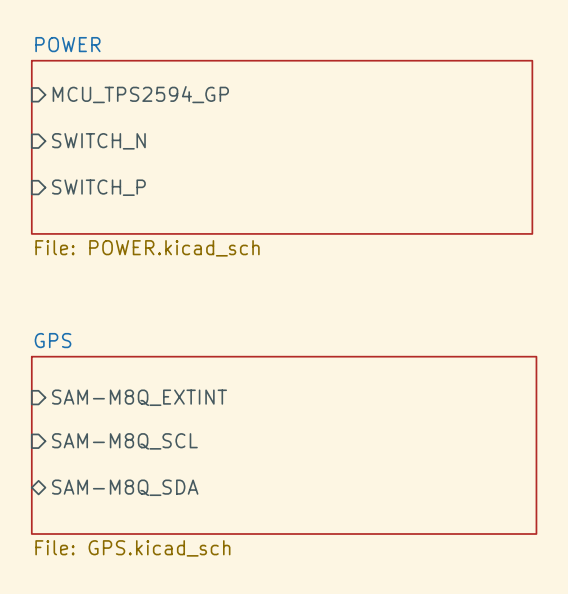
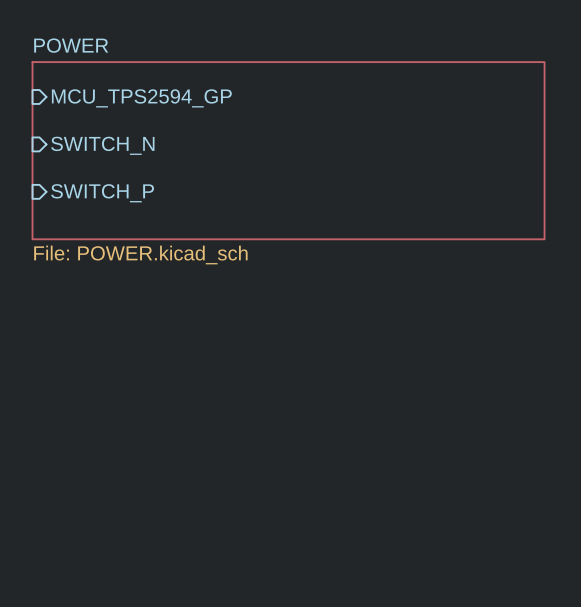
sheet pin: SAM-M8Q_EXTINT (139, 397) -> none
sheet pin: SAM-M8Q_SCL (124, 441) -> none
sheet GPS: File: GPS.kicad_sch (284, 445) -> none
sheet pin: SAM-M8Q_SDA (125, 487) -> none

